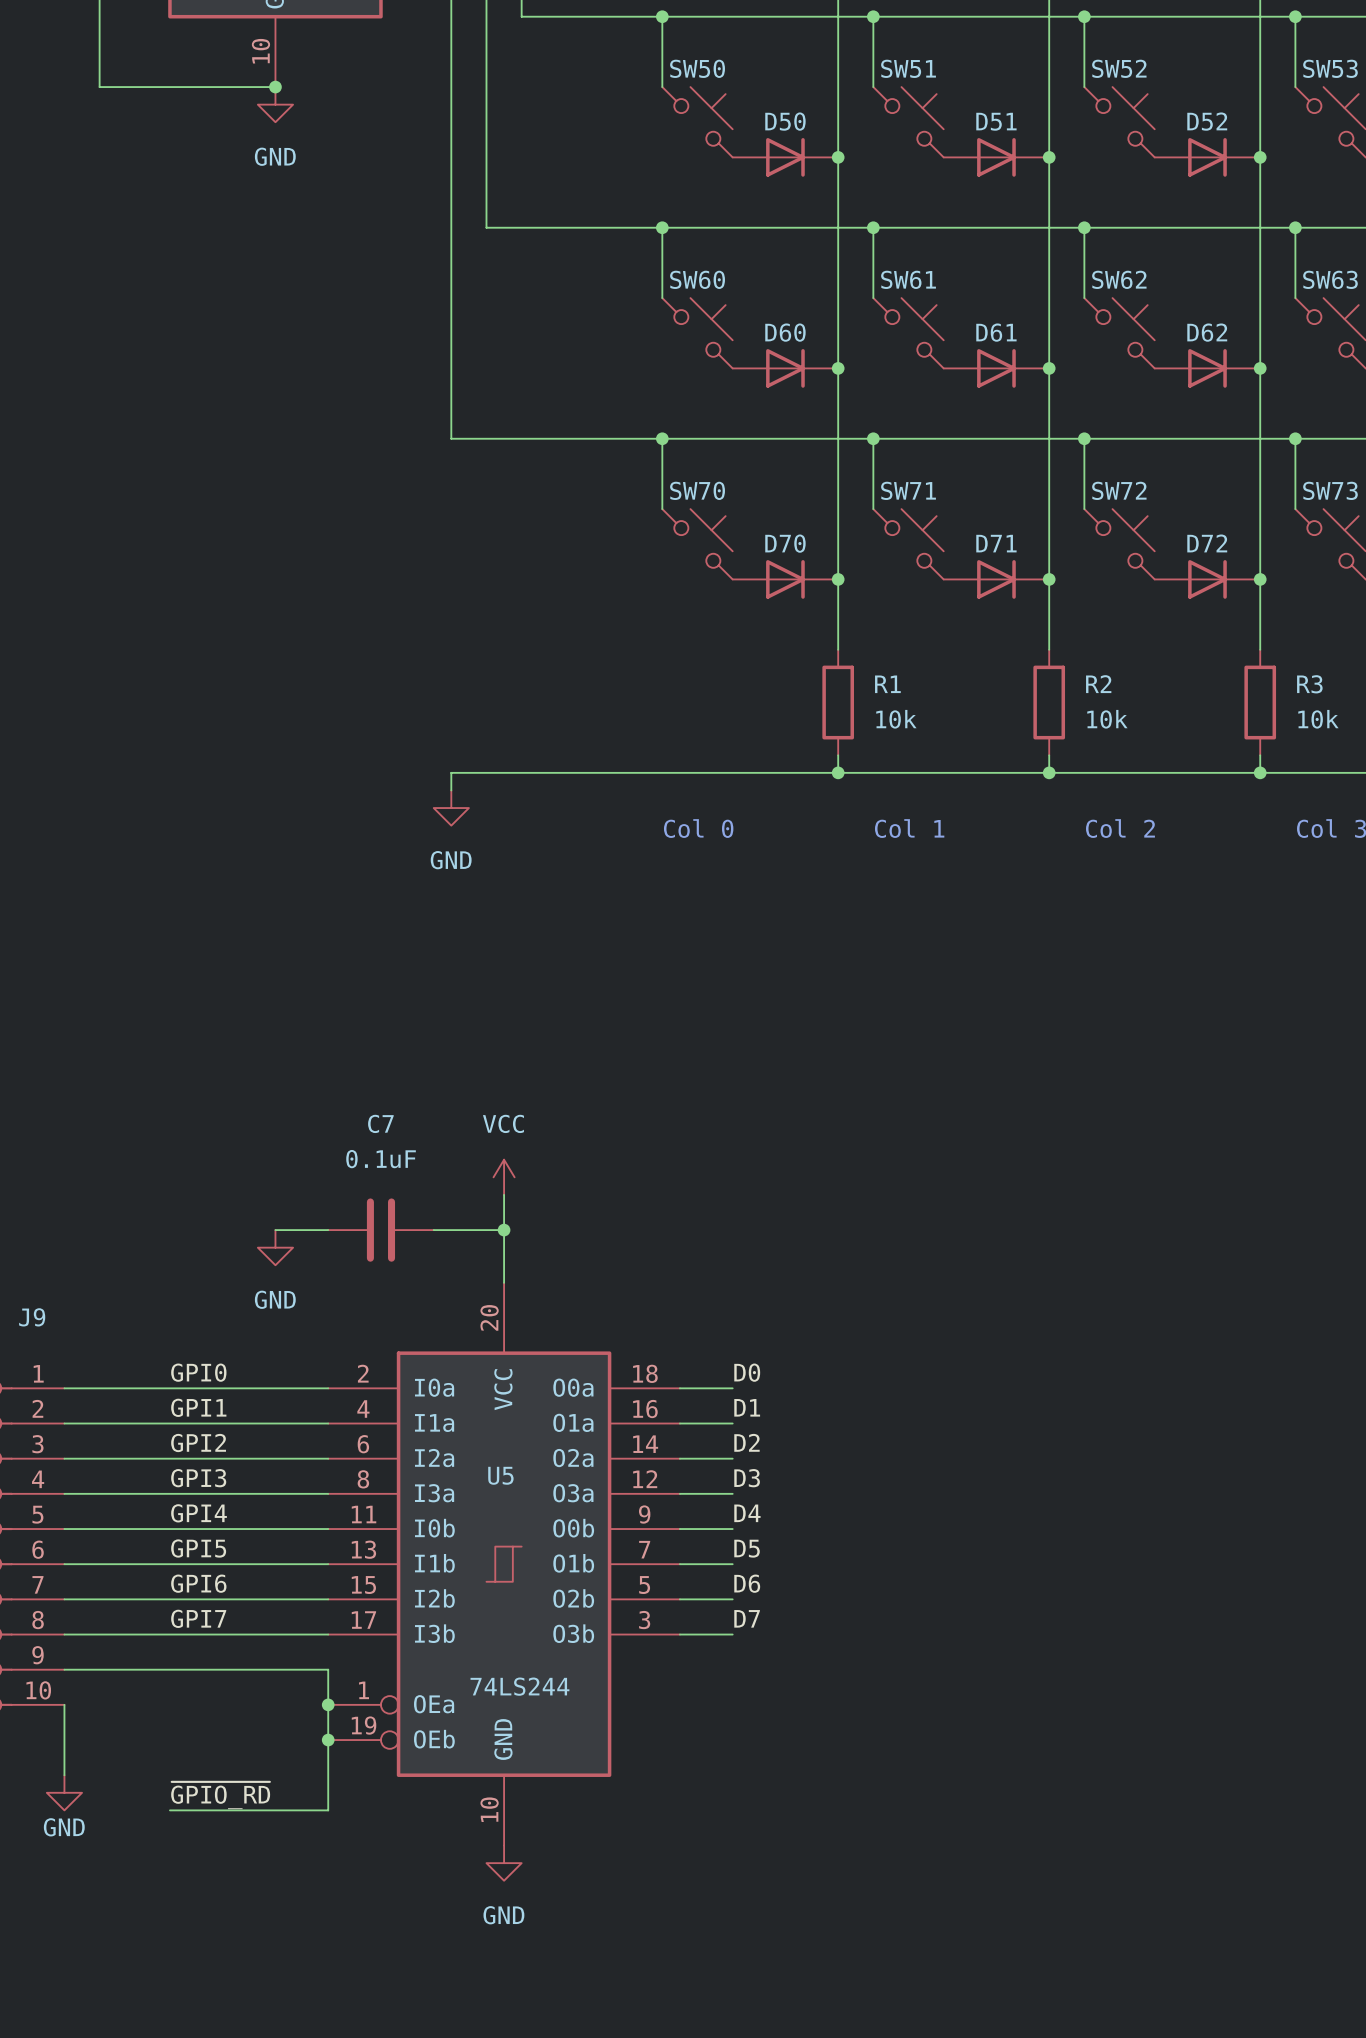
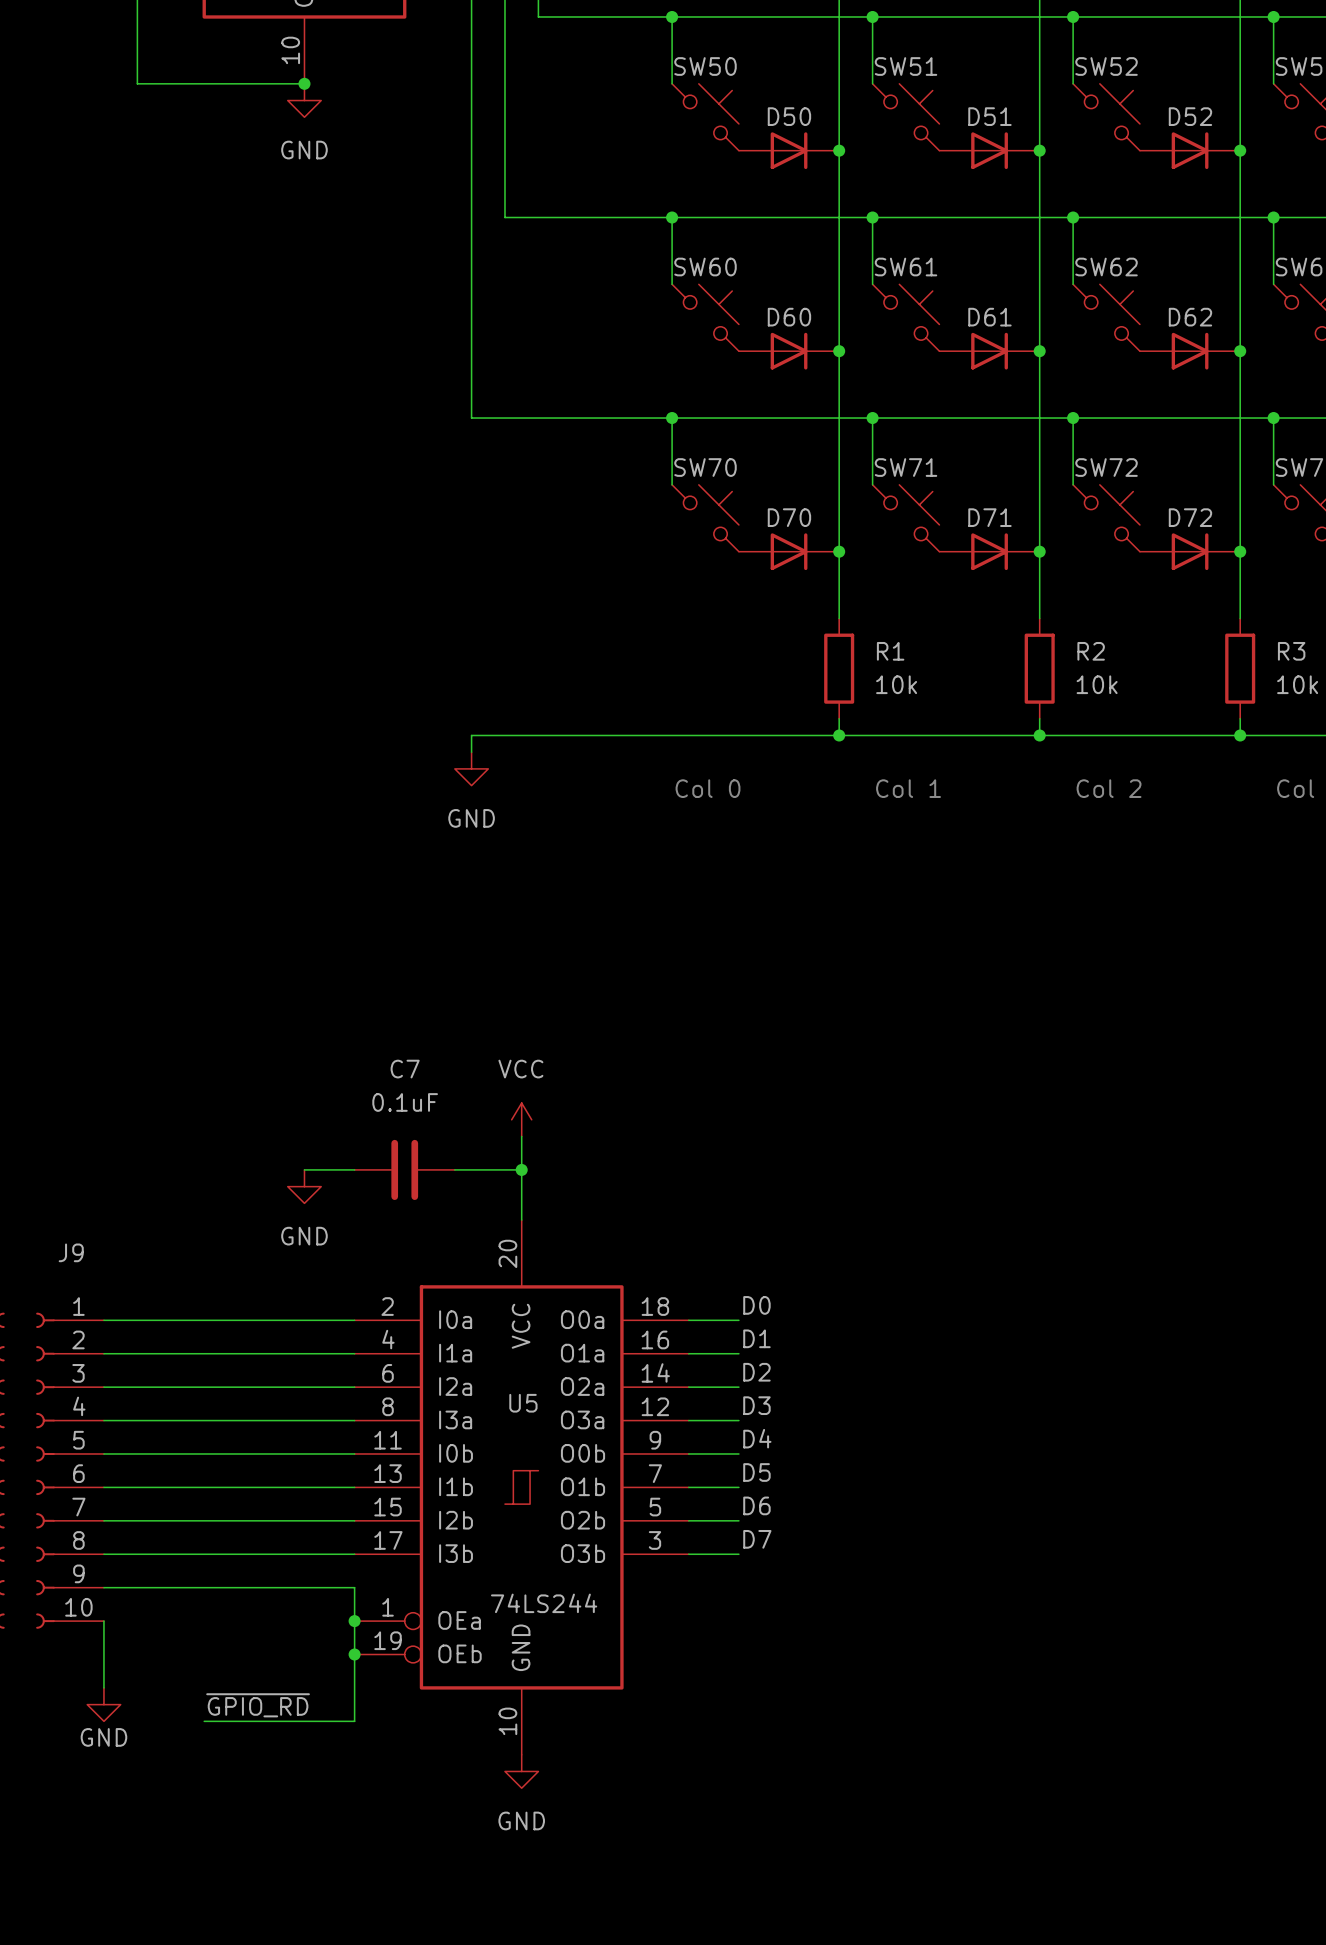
label: GPI0 (198, 1372) -> none
label: GPI1 (198, 1407) -> none
label: GPI2 (198, 1443) -> none
label: GPI3 (198, 1478) -> none
label: GPI4 (199, 1513) -> none
label: GPI5 (198, 1548) -> none
label: GPI6 (198, 1583) -> none
label: GPI7 (198, 1618) -> none

